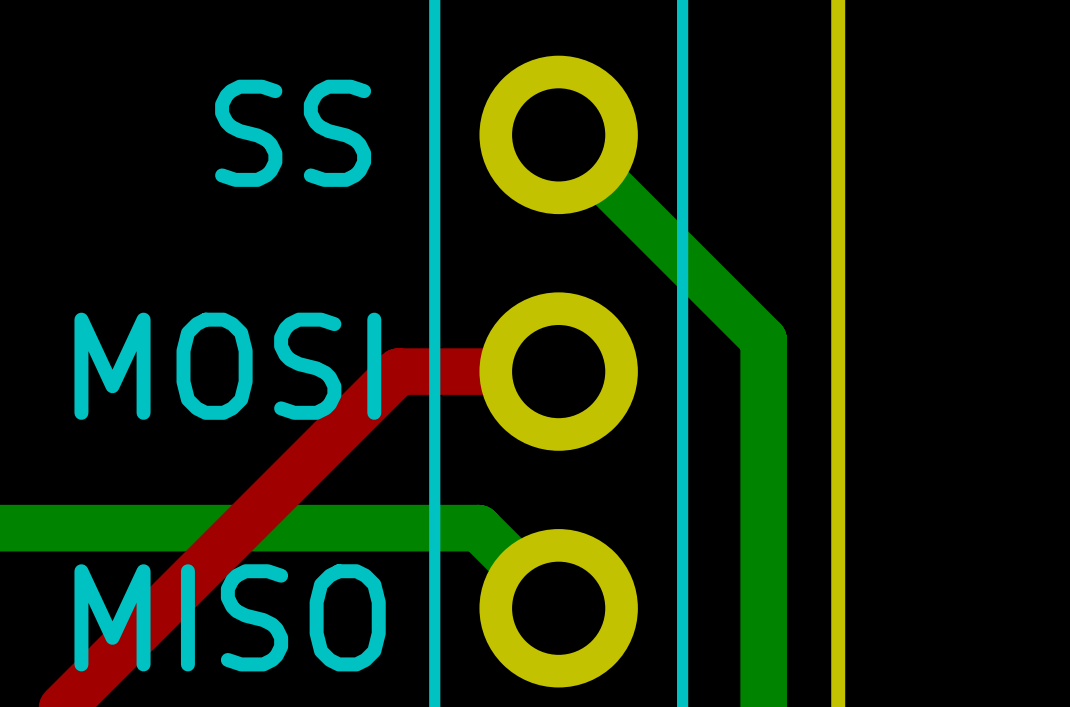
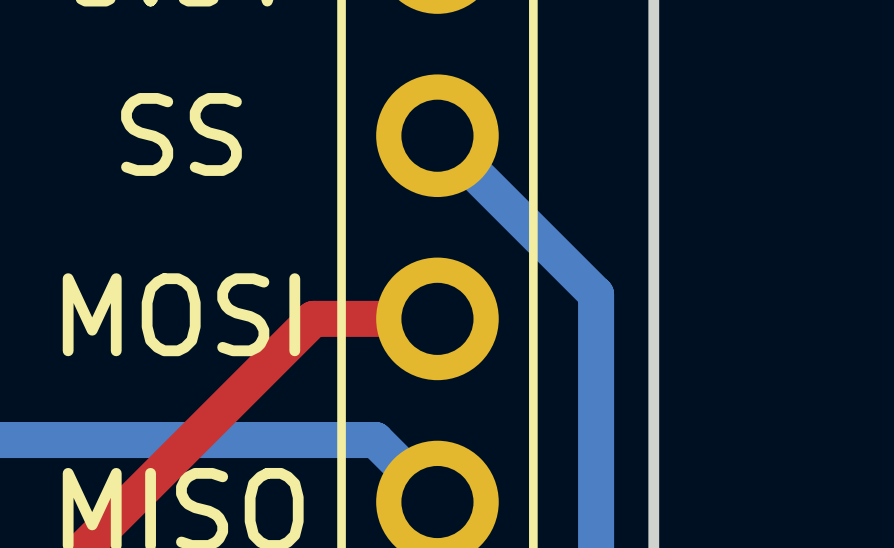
text position: SS (293, 133) -> SS (181, 134)

